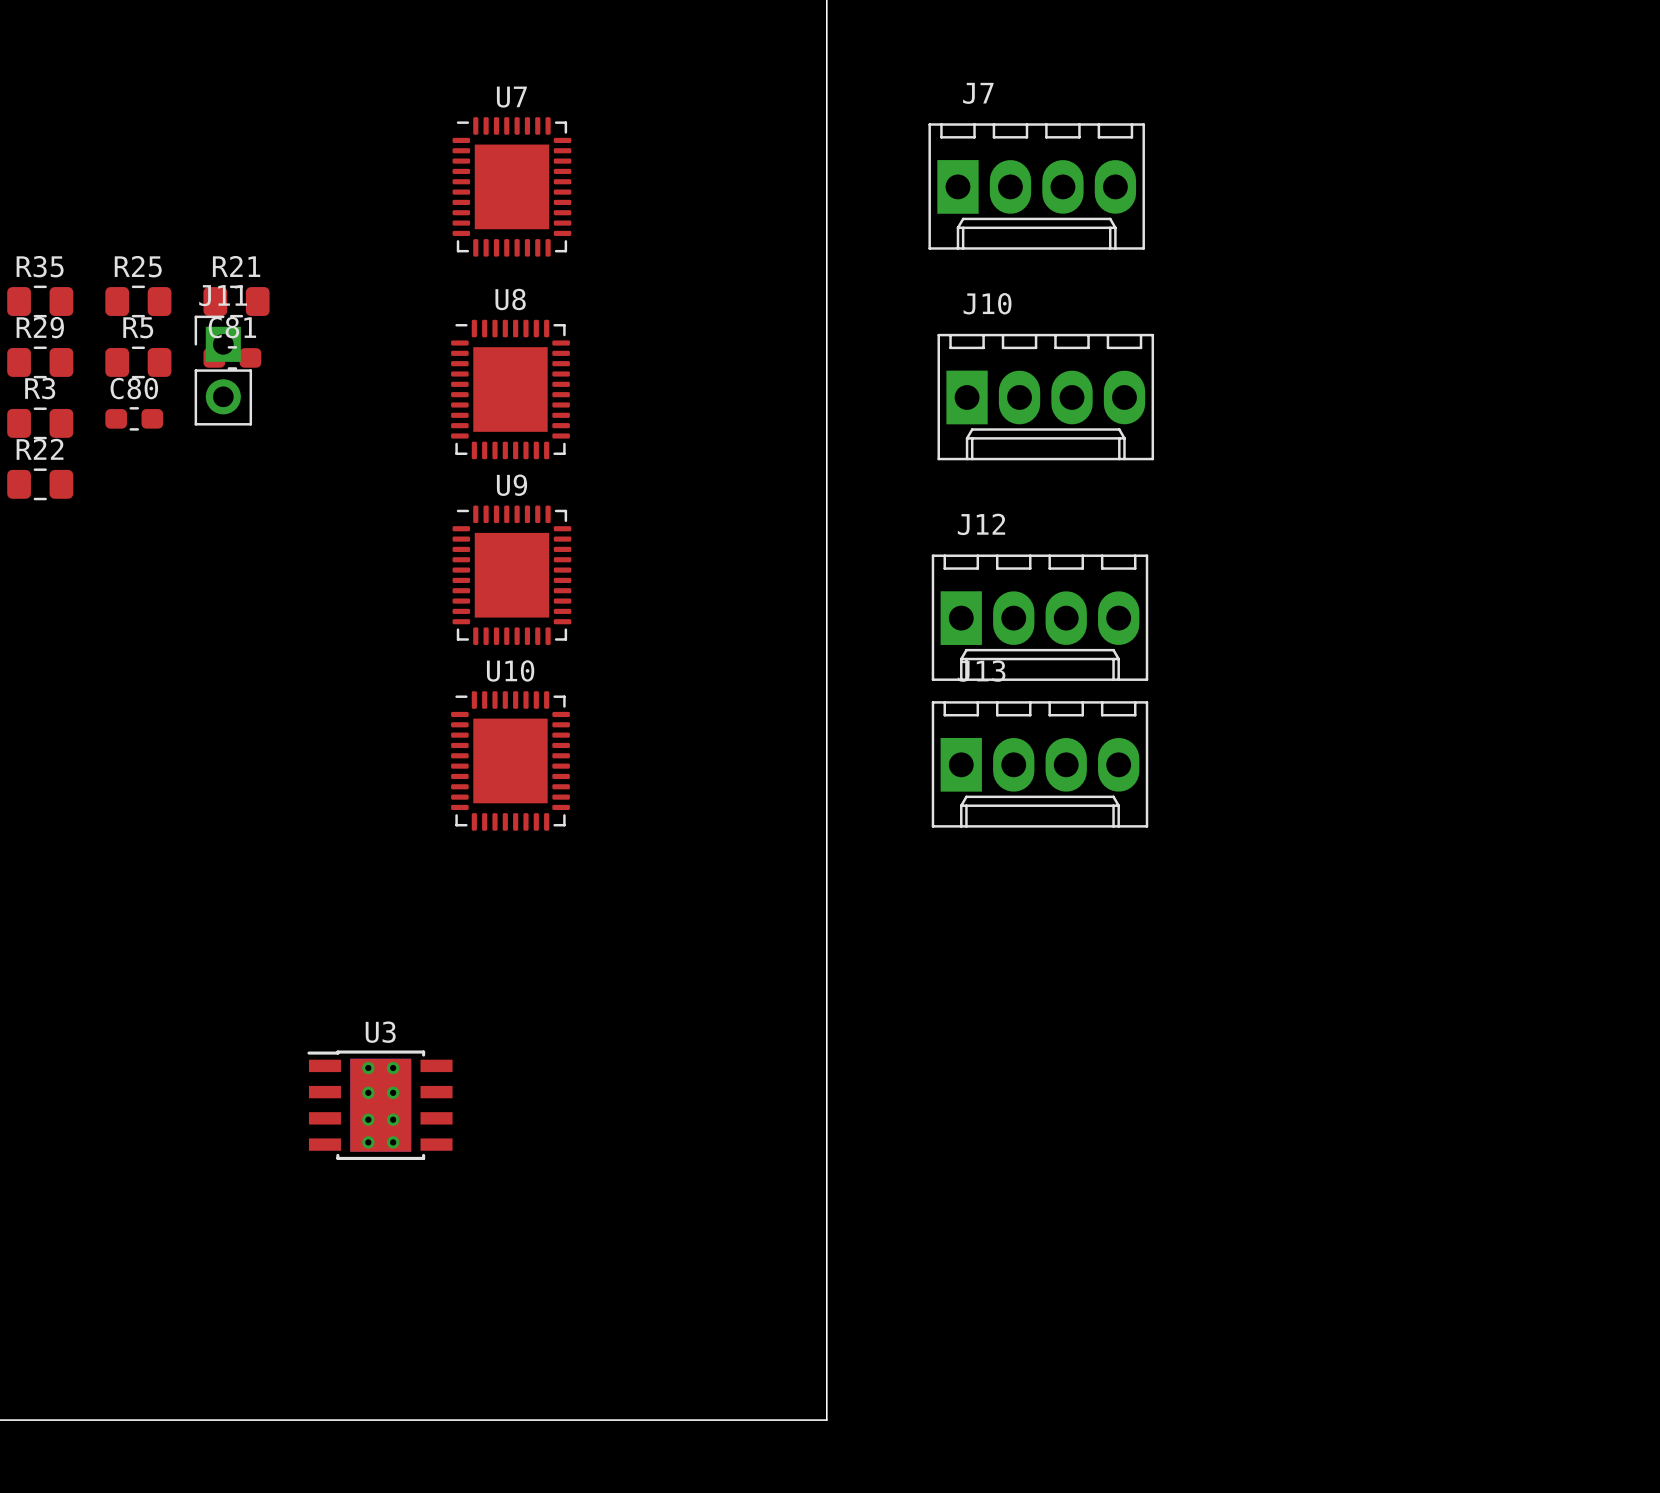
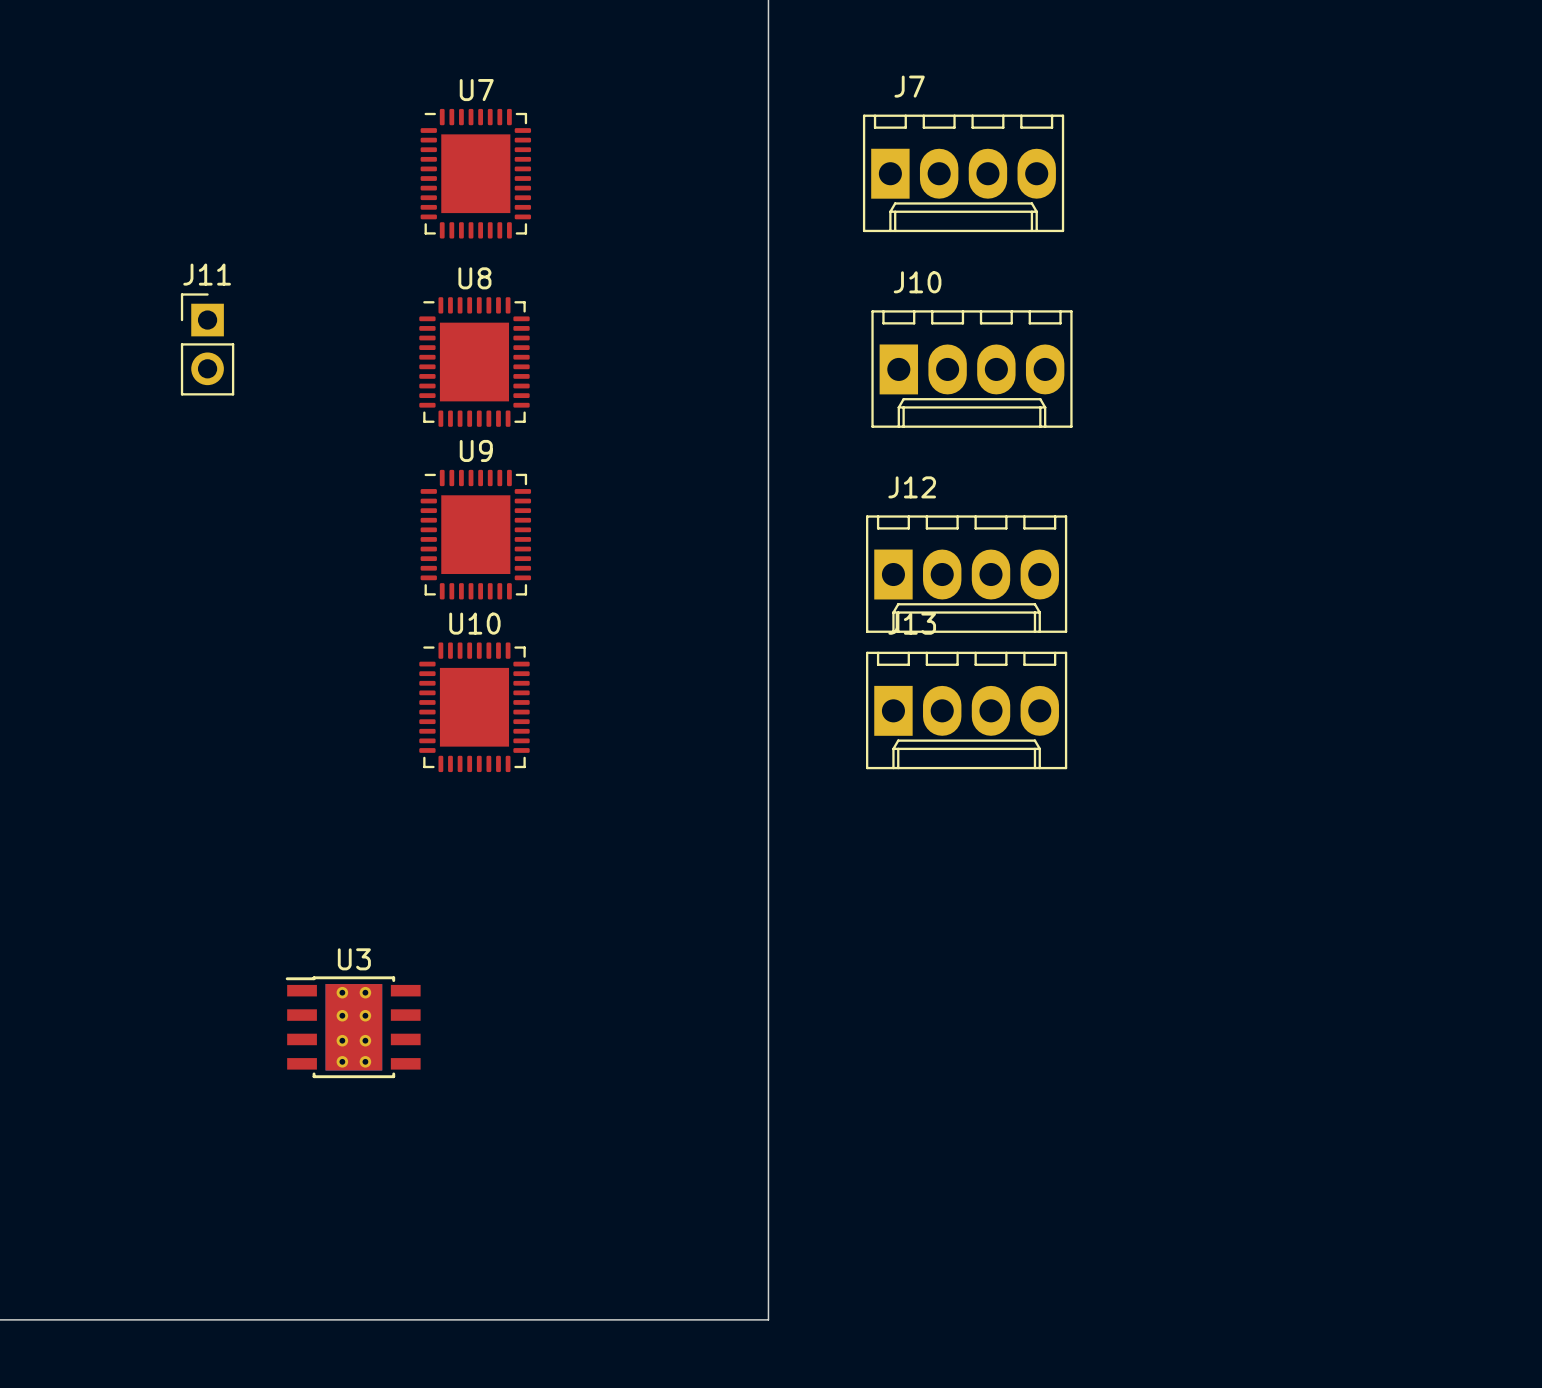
R35: (40, 301) -> none
R25: (138, 301) -> none
R21: (236, 301) -> none
C81: (232, 357) -> none
R29: (40, 362) -> none
R5: (138, 362) -> none
C80: (134, 418) -> none
R3: (40, 423) -> none
R22: (40, 484) -> none

